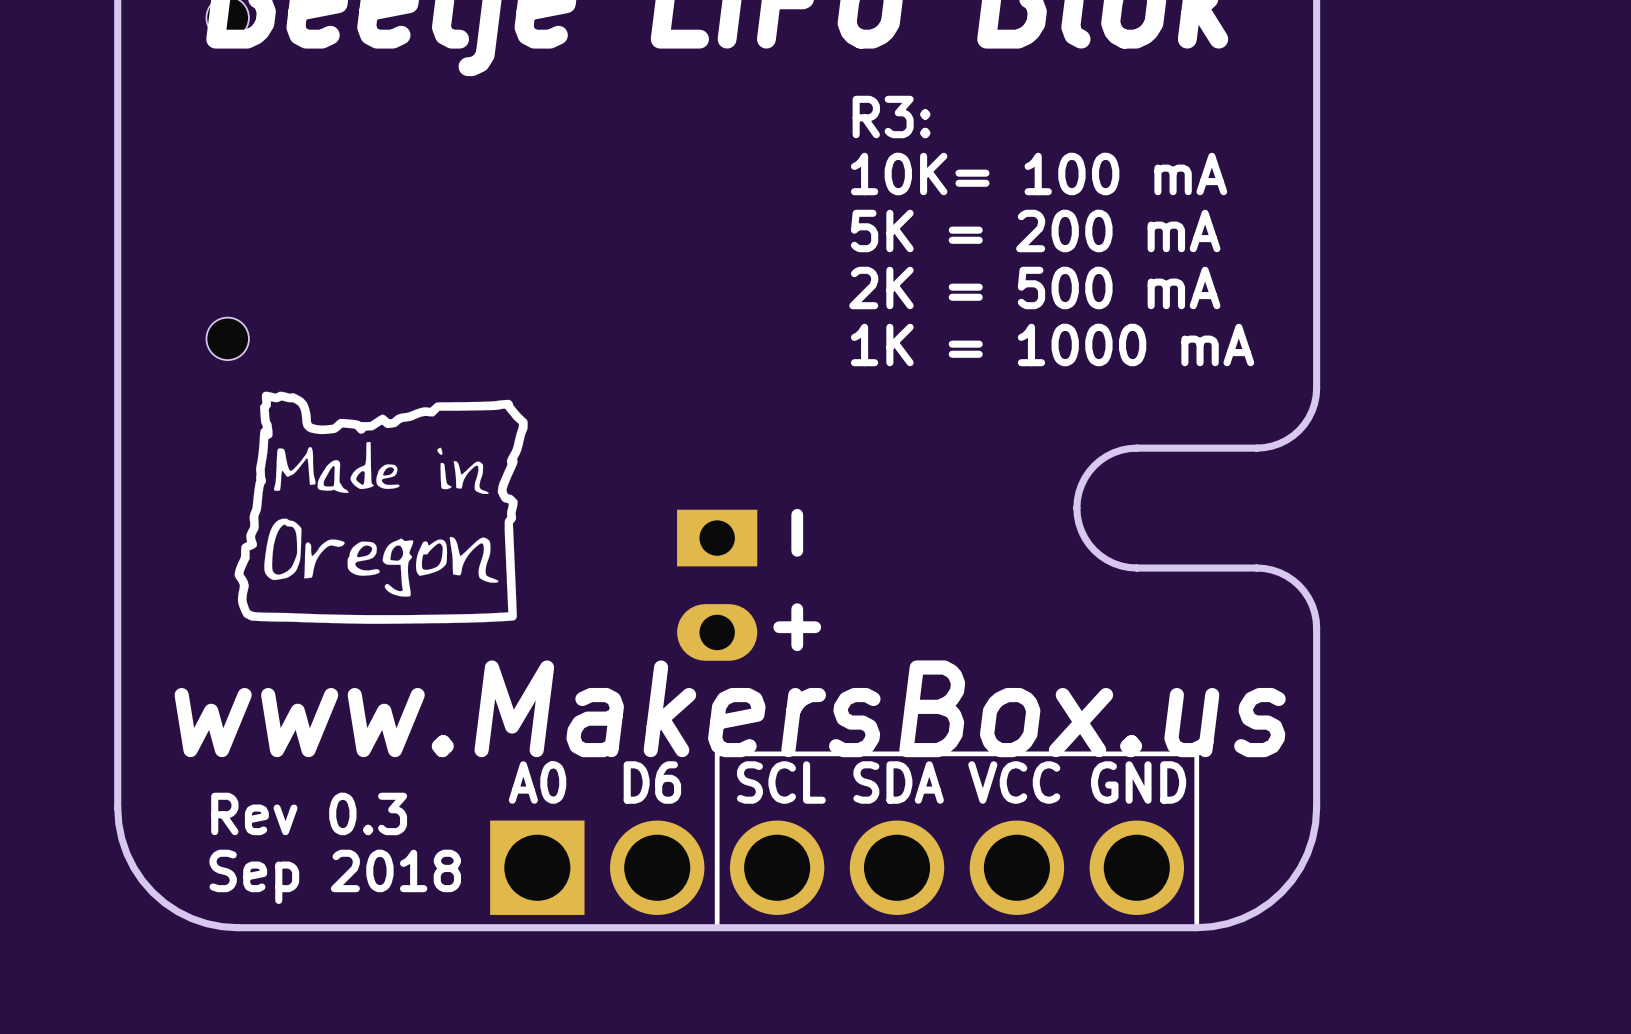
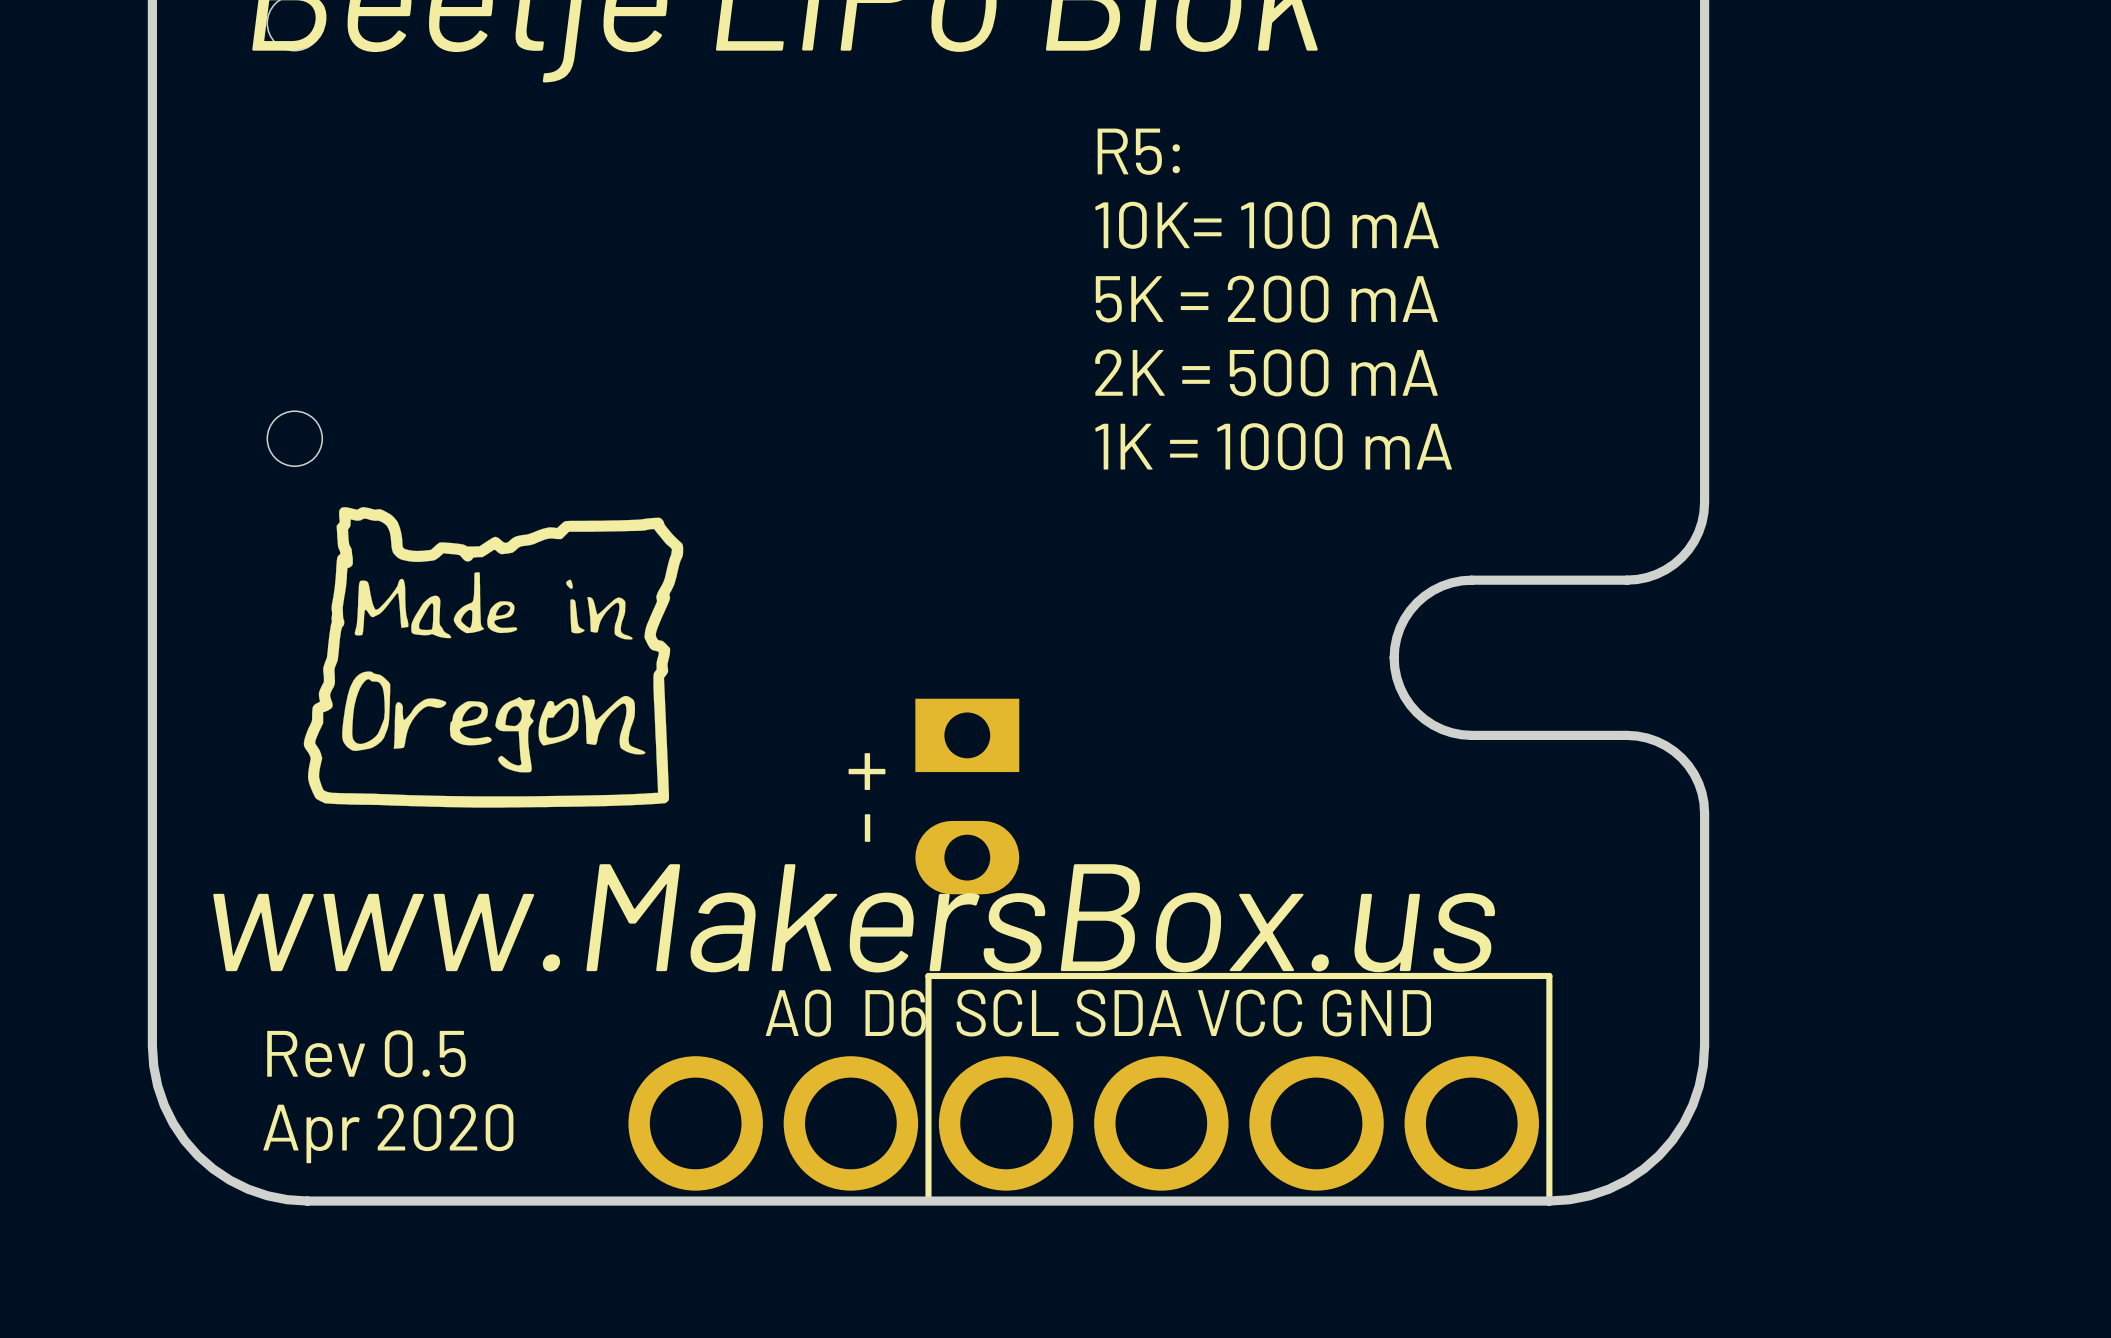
text: R3: (891, 117) -> R5: (1138, 151)
text rotation: 0° (797, 580) -> 180° (867, 797)
part position: (717, 585) -> (967, 796)
part footprint: [490, 751, 1200, 931] -> [628, 972, 1553, 1205]
text: Rev 0.3 (309, 813) -> Rev 0.5 (366, 1053)
text: Sep 2018 (335, 876) -> Apr 2020 (388, 1133)

